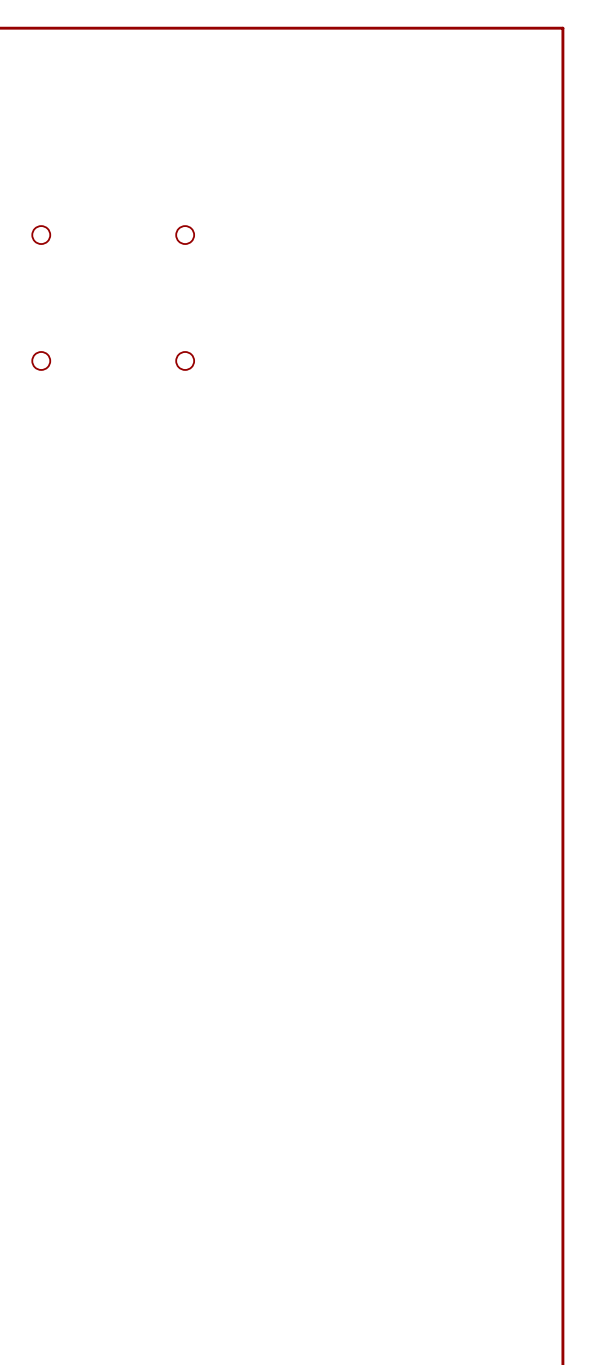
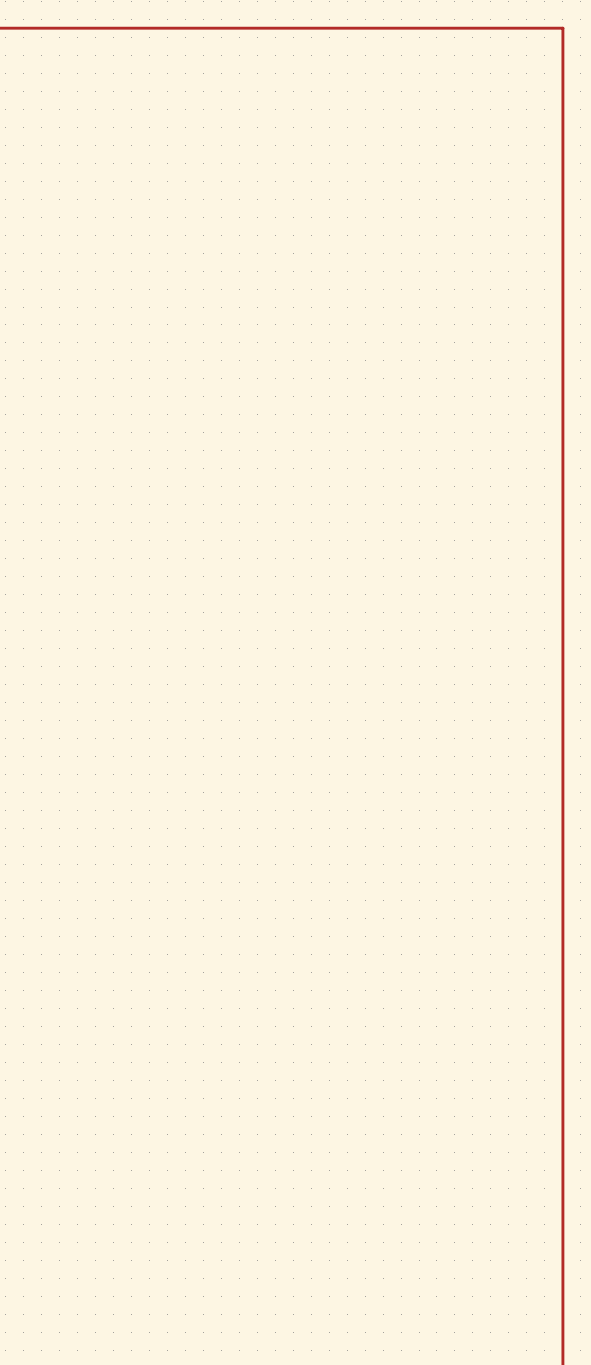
part: (41, 235) -> none
part: (185, 235) -> none
part: (41, 360) -> none
part: (185, 360) -> none

